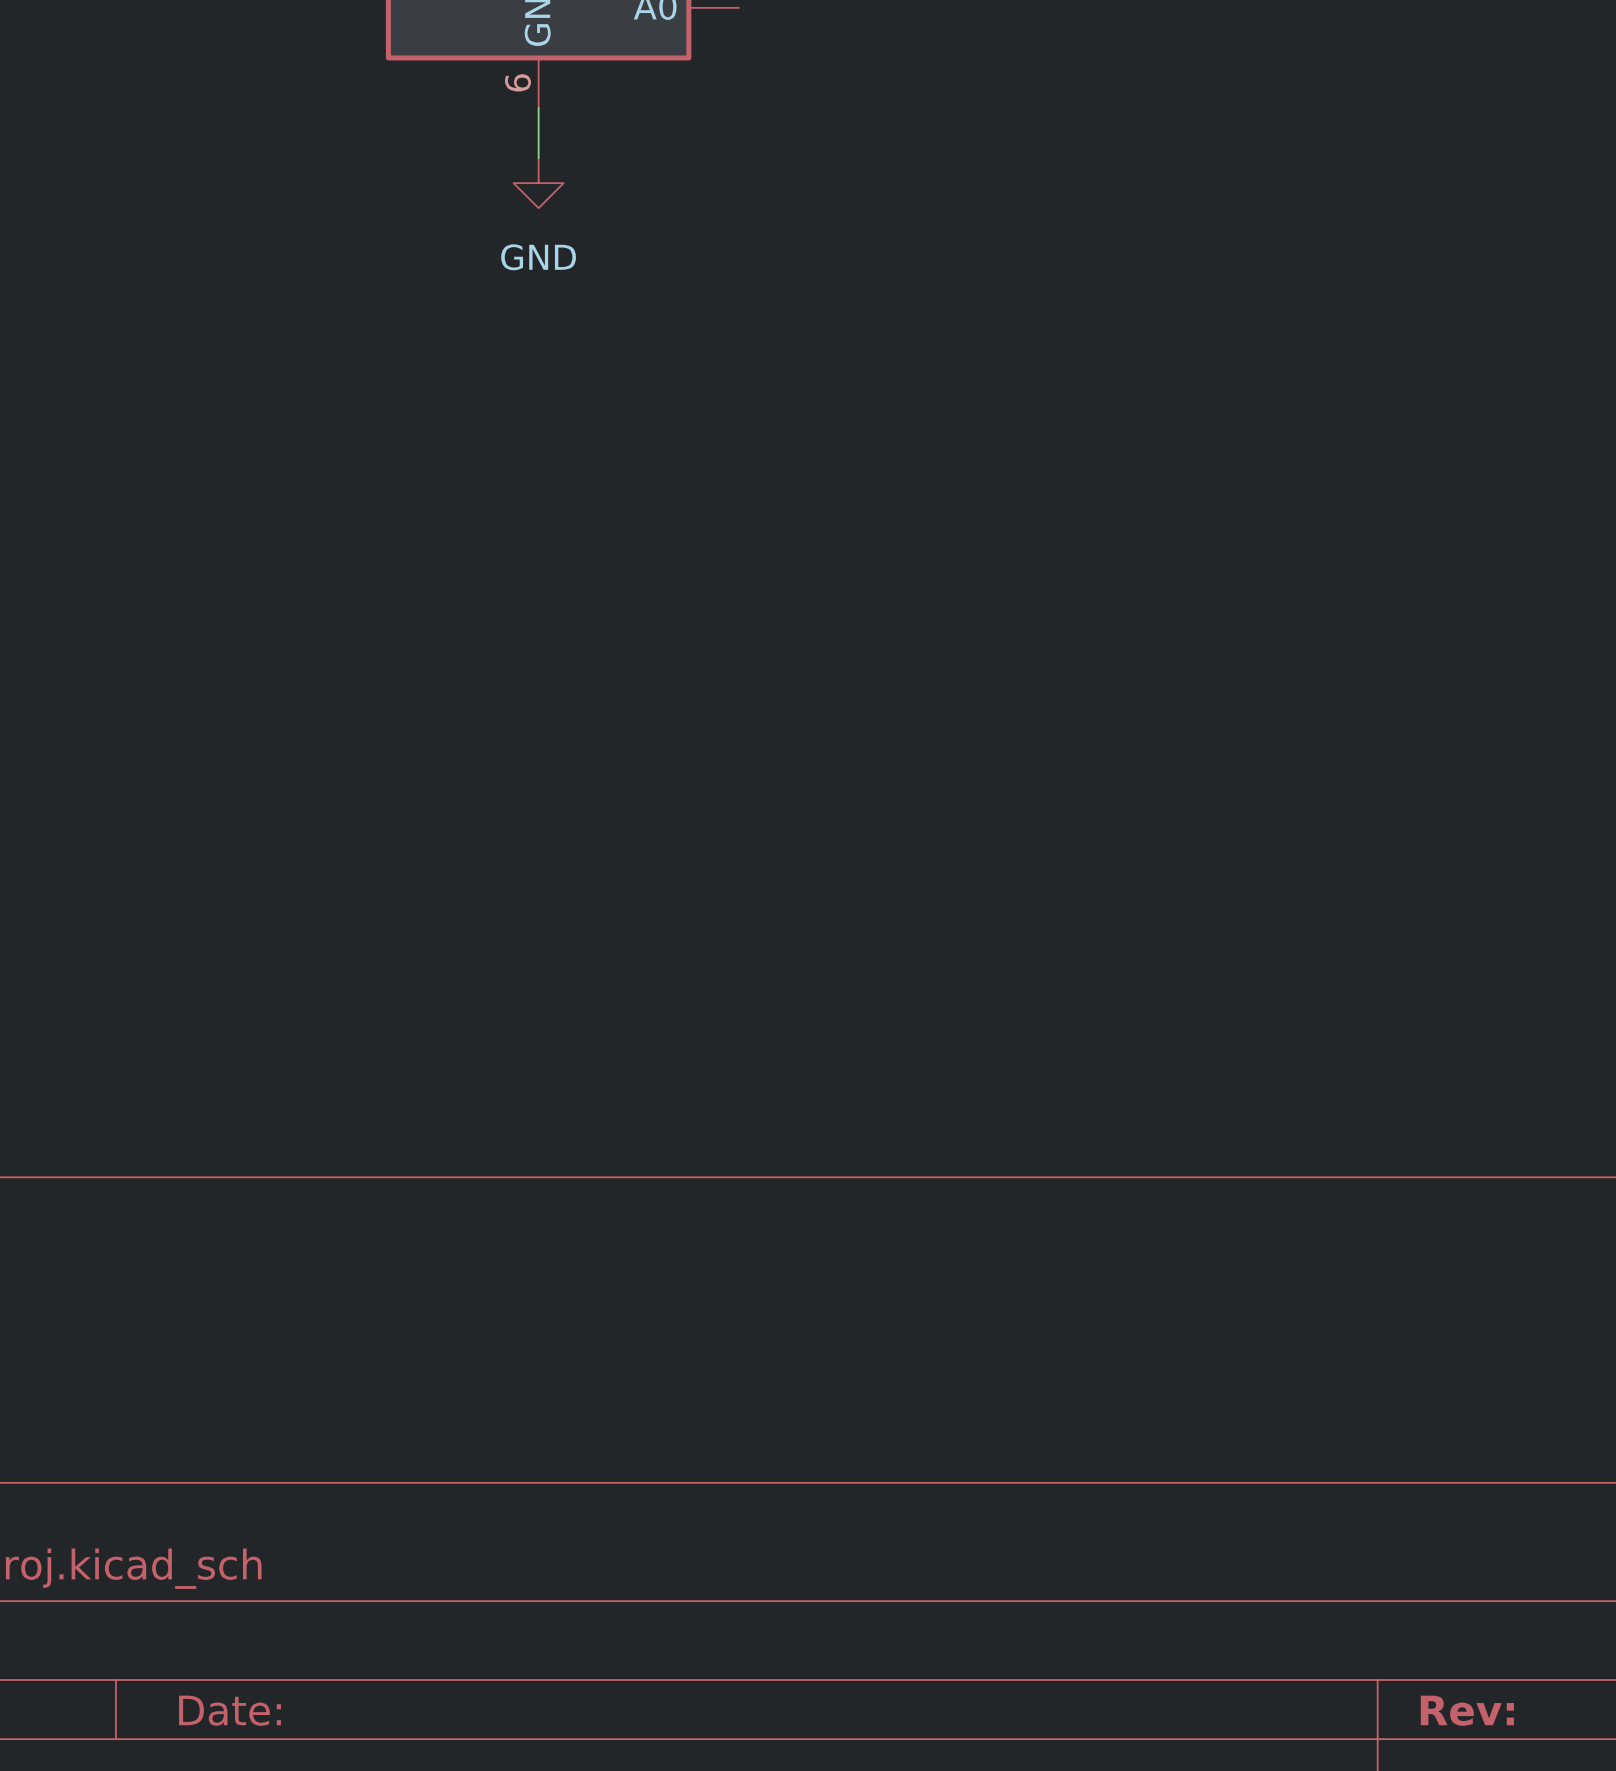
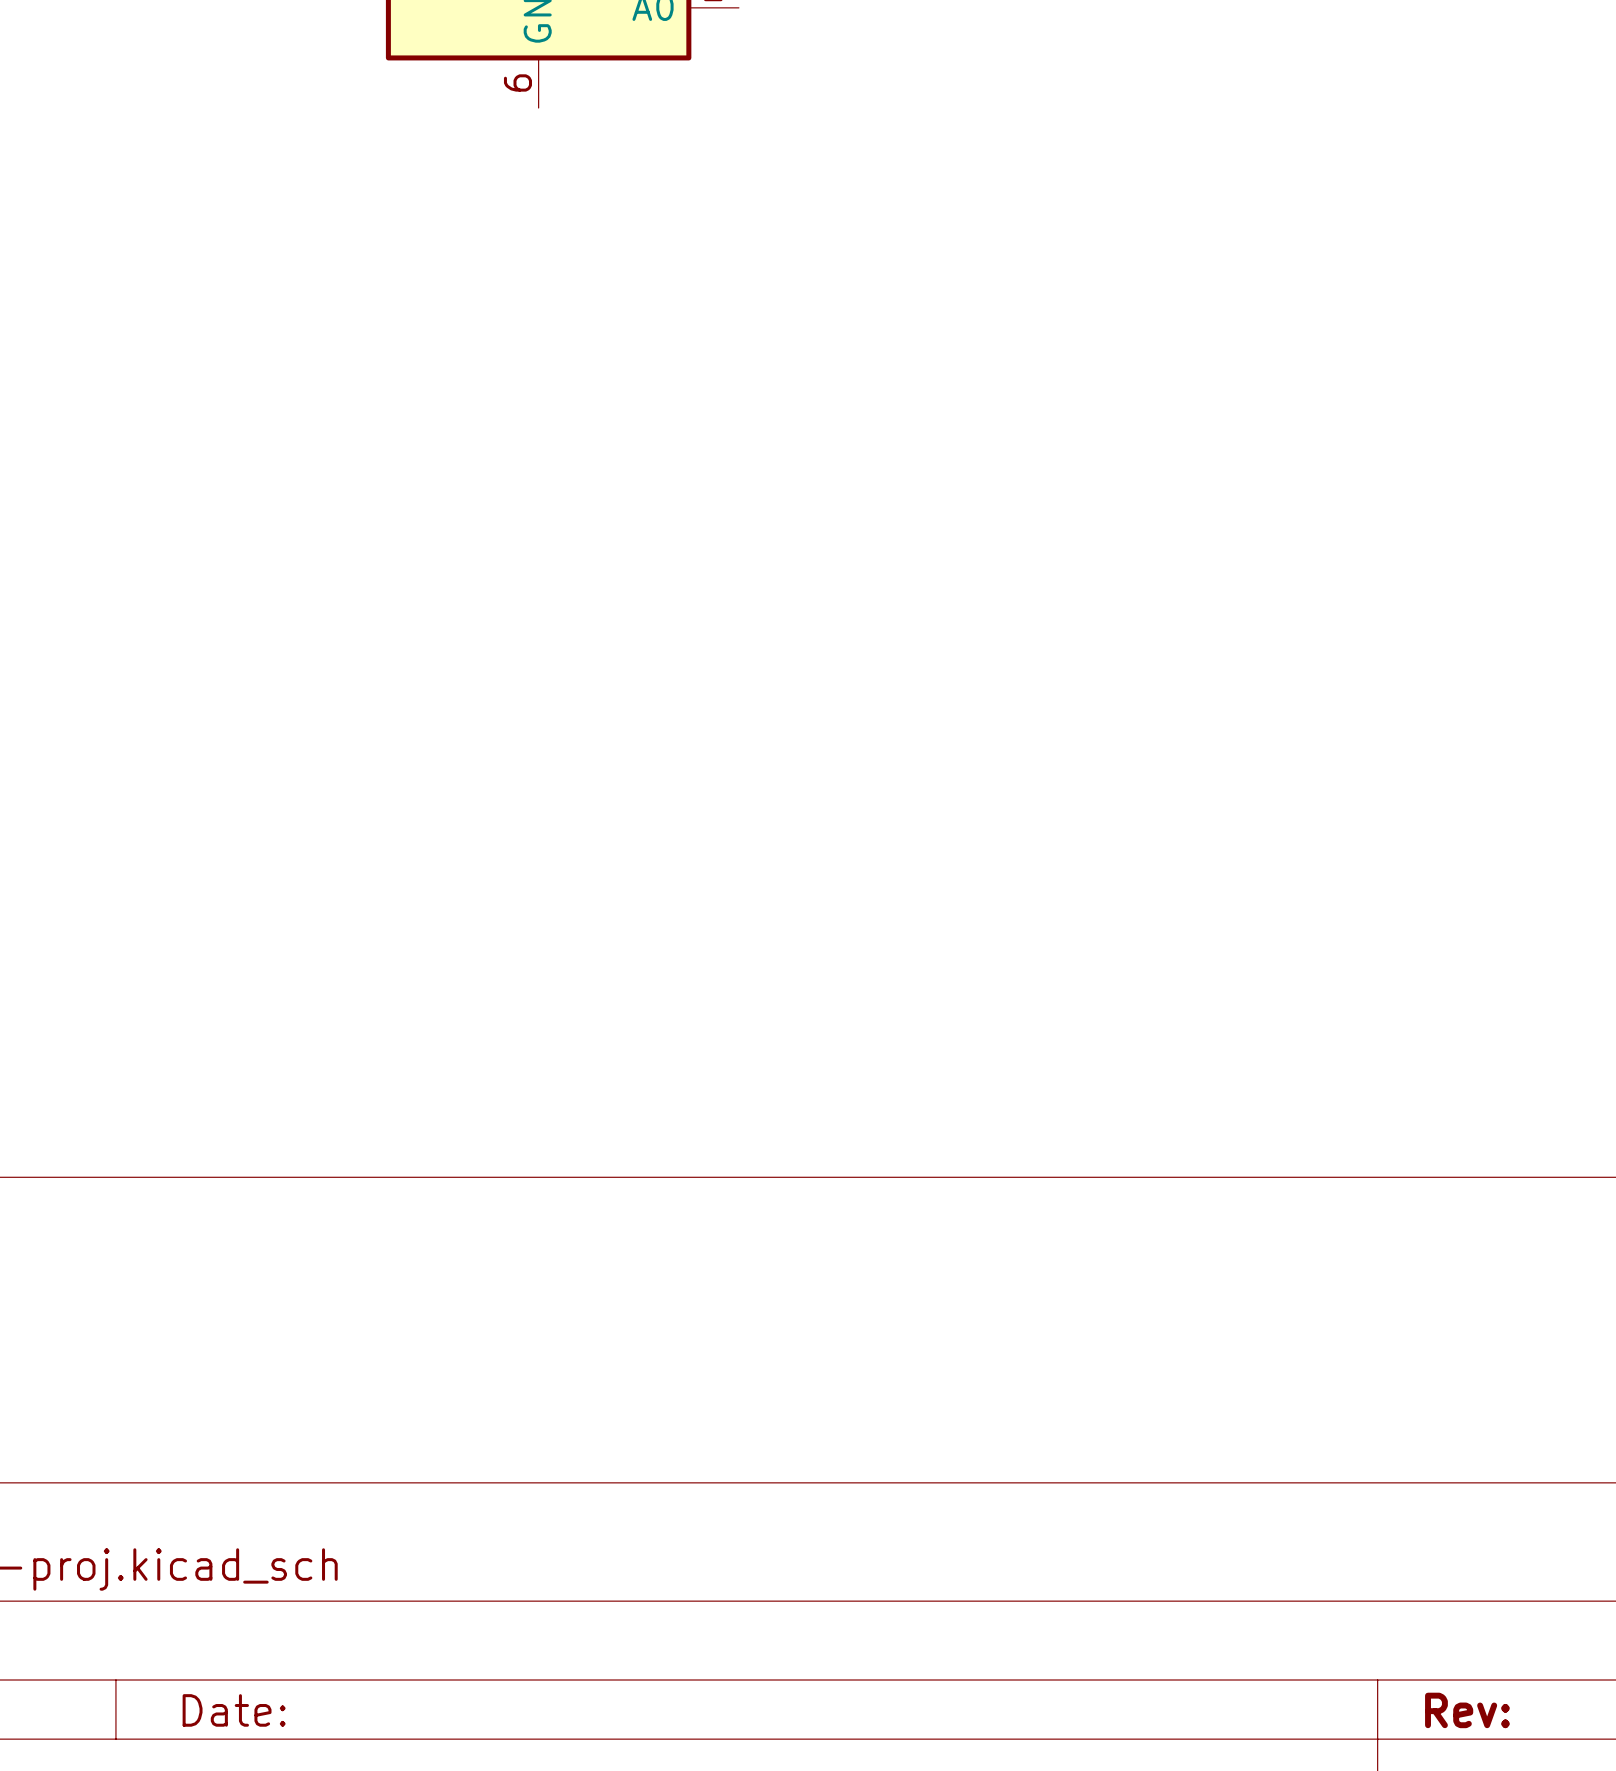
wire: (538, 108) (538, 158) -> none
power symbol: GND (538, 183) -> none

